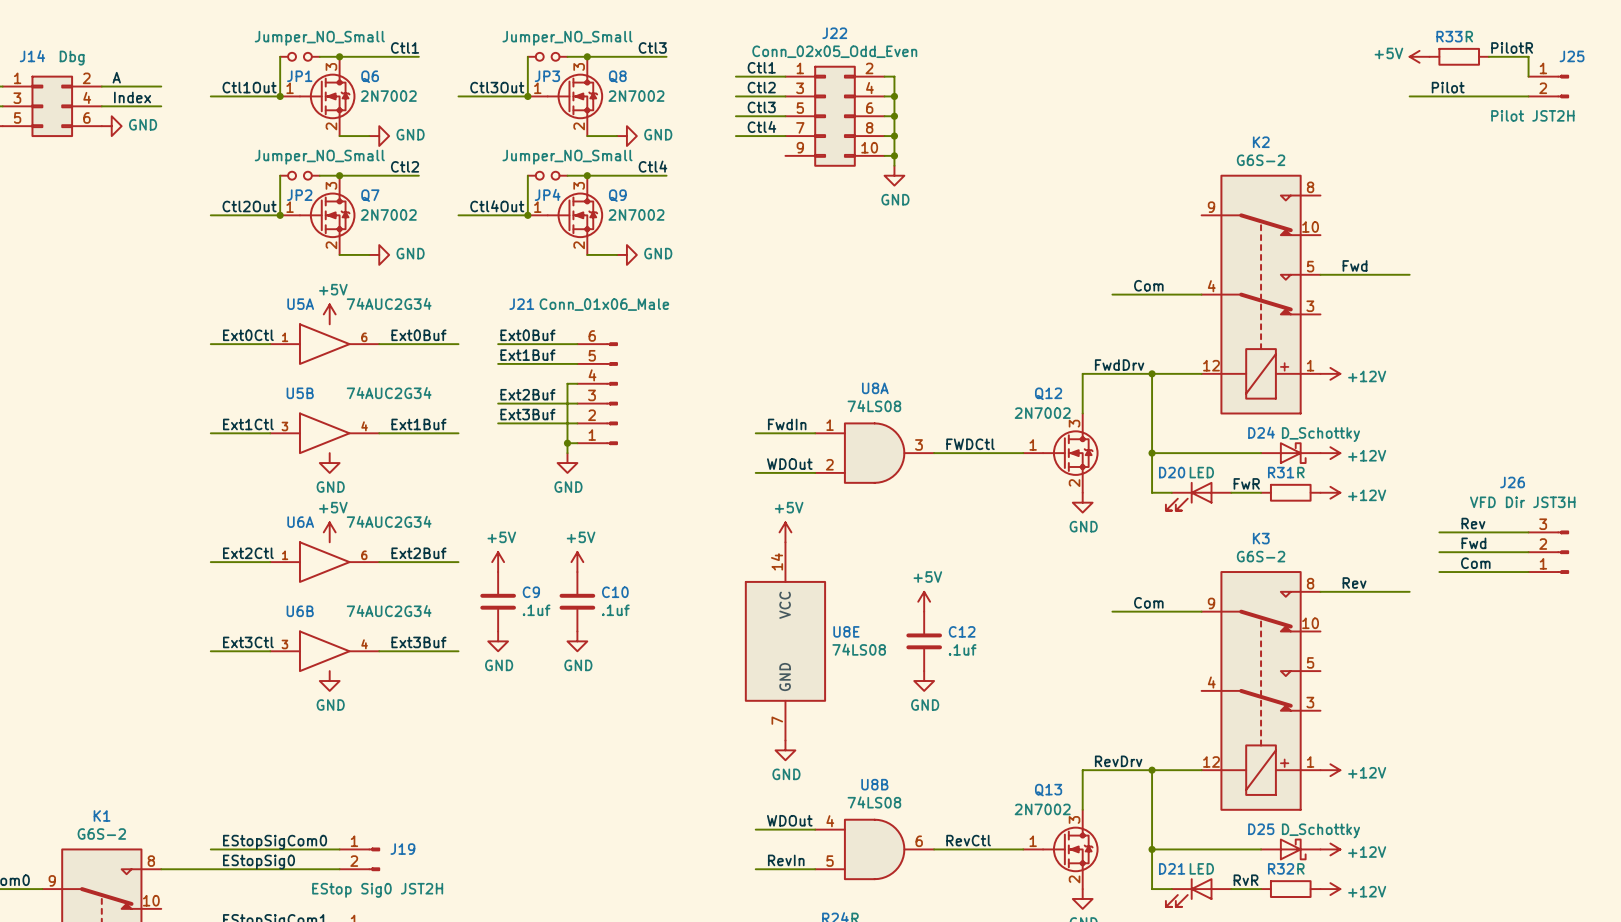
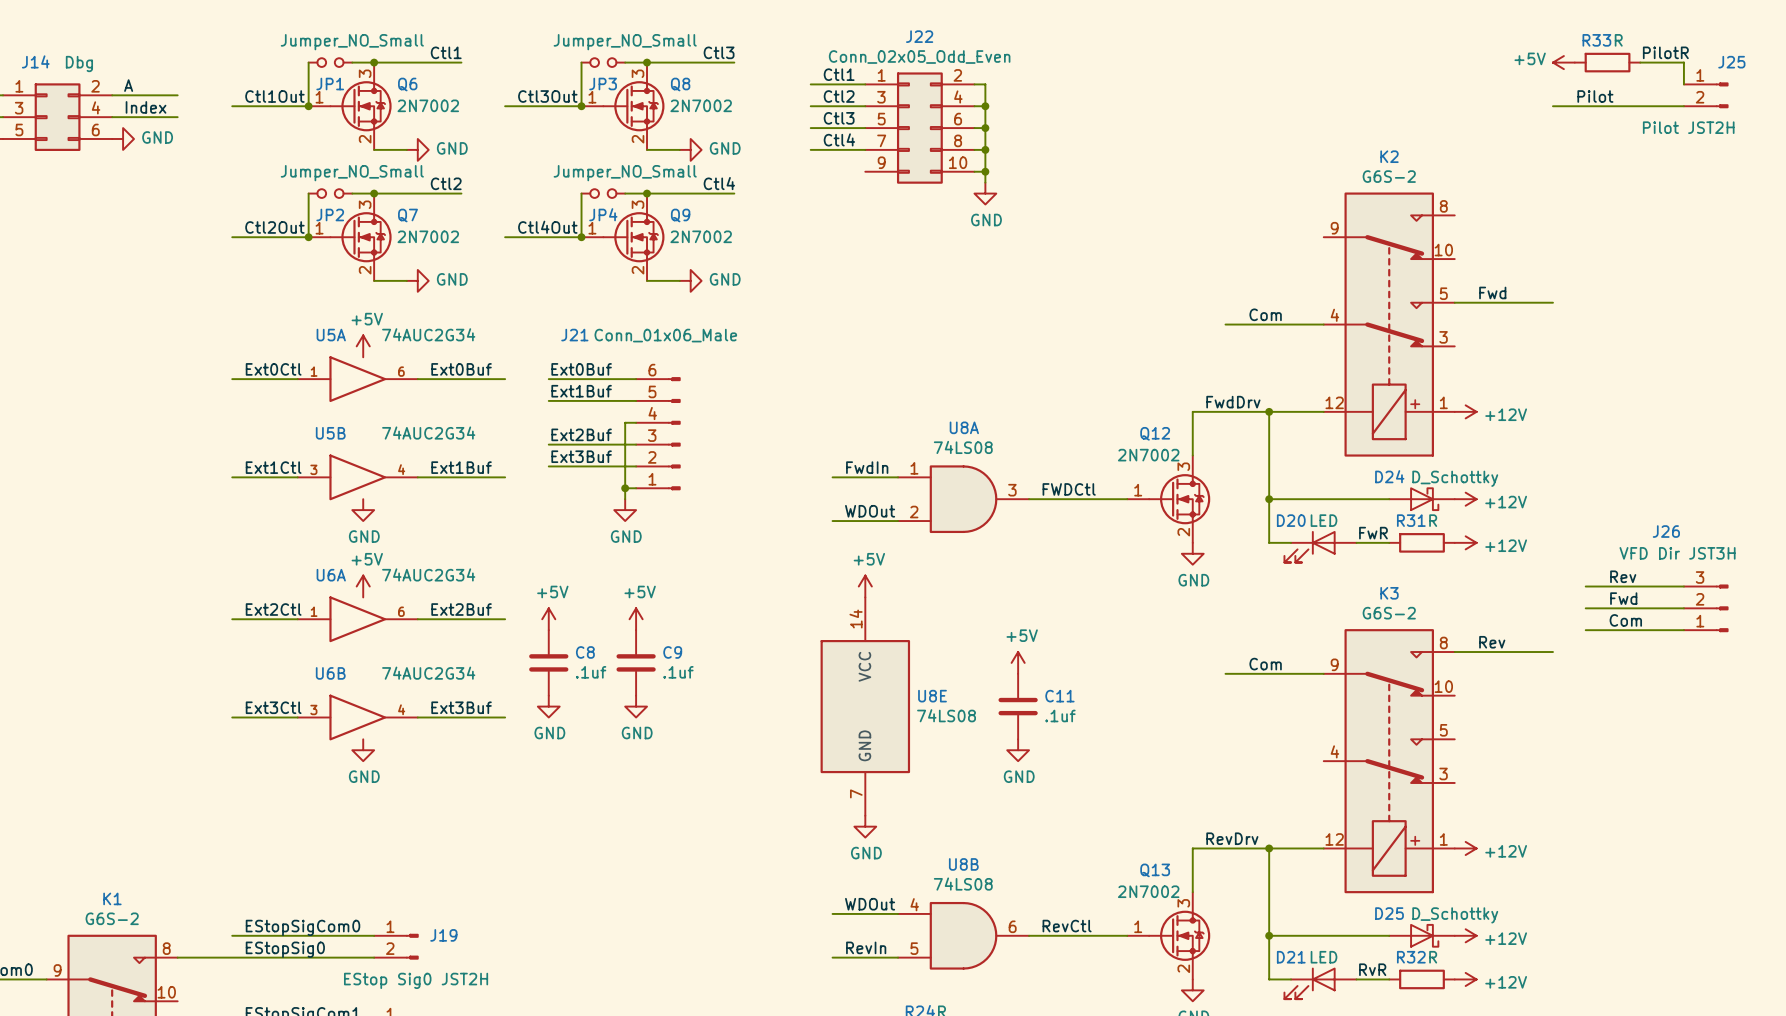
C9 name: C9 (531, 592) -> C8 (585, 652)
C10 name: C10 (615, 592) -> C9 (672, 652)
C12 name: C12 (962, 631) -> C11 (1059, 696)

